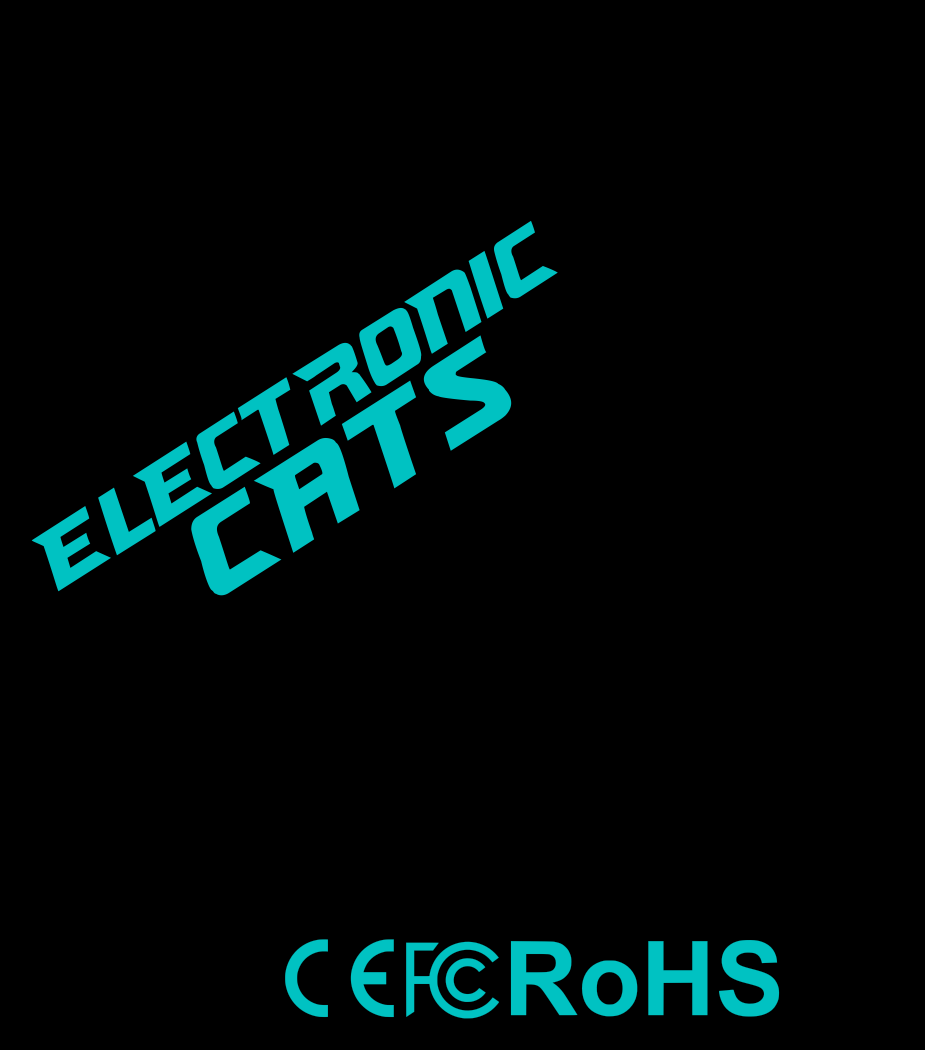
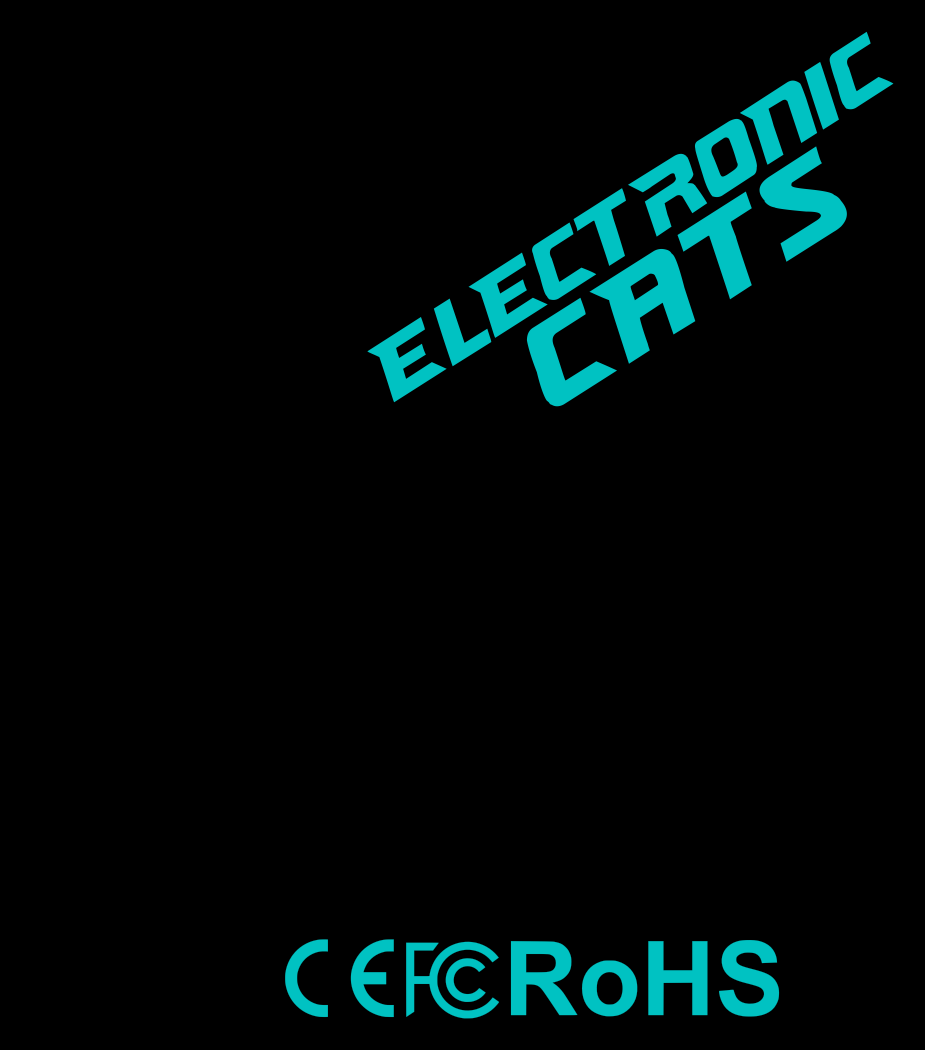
drawing: none -> [367, 31, 894, 407]
drawing: [31, 220, 558, 596] -> none

